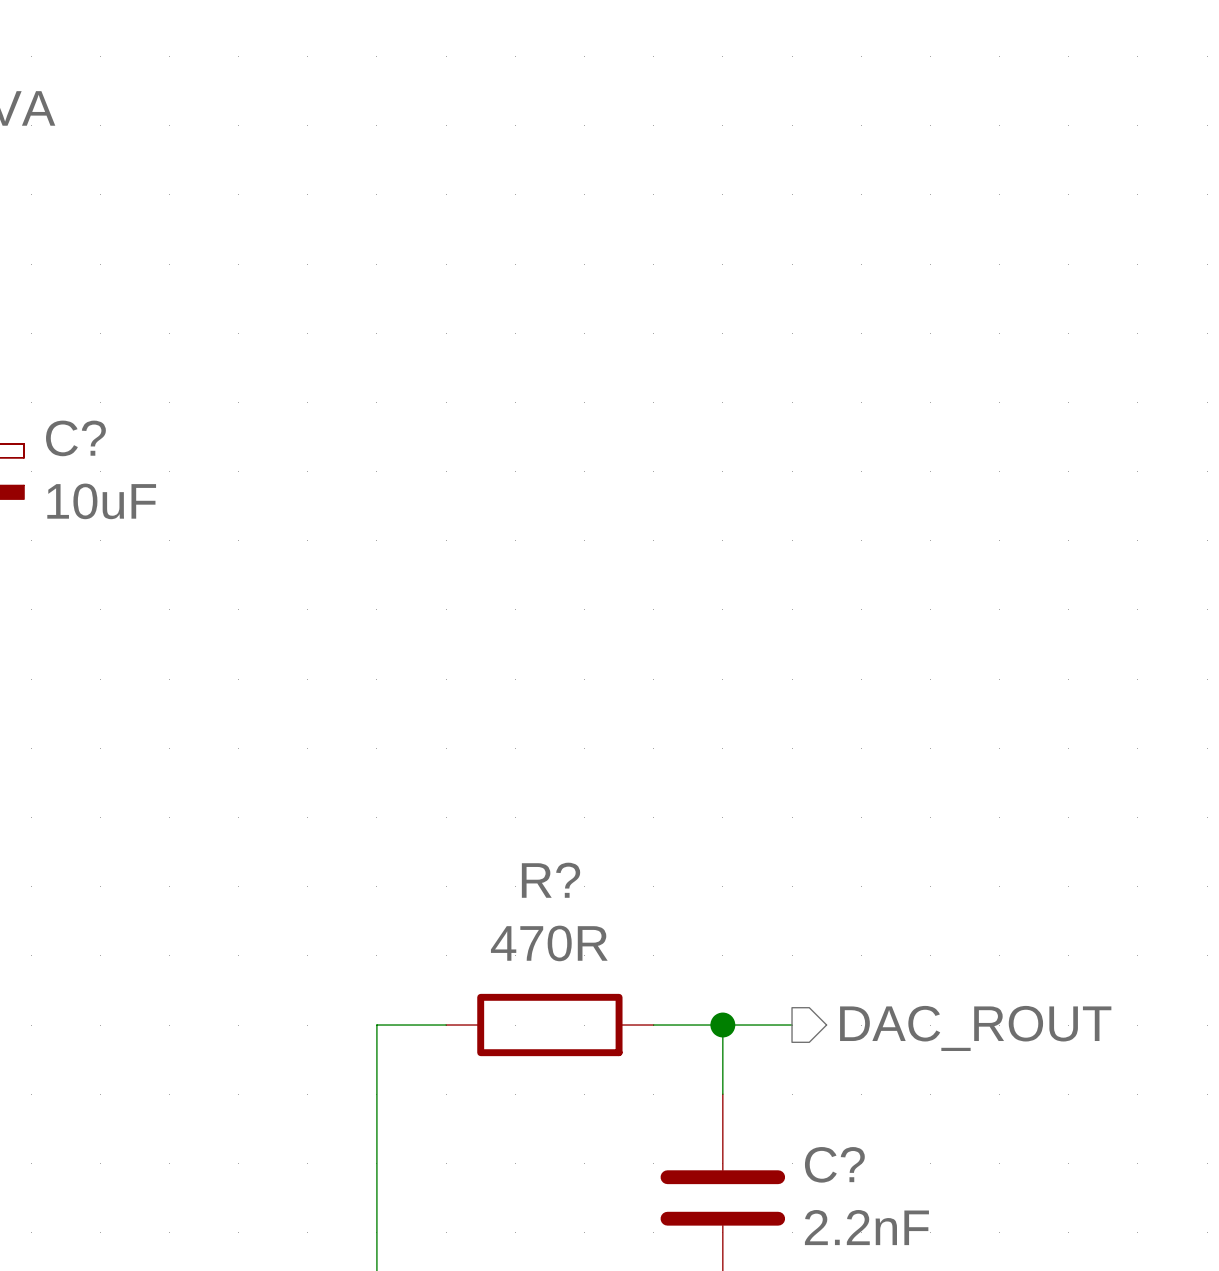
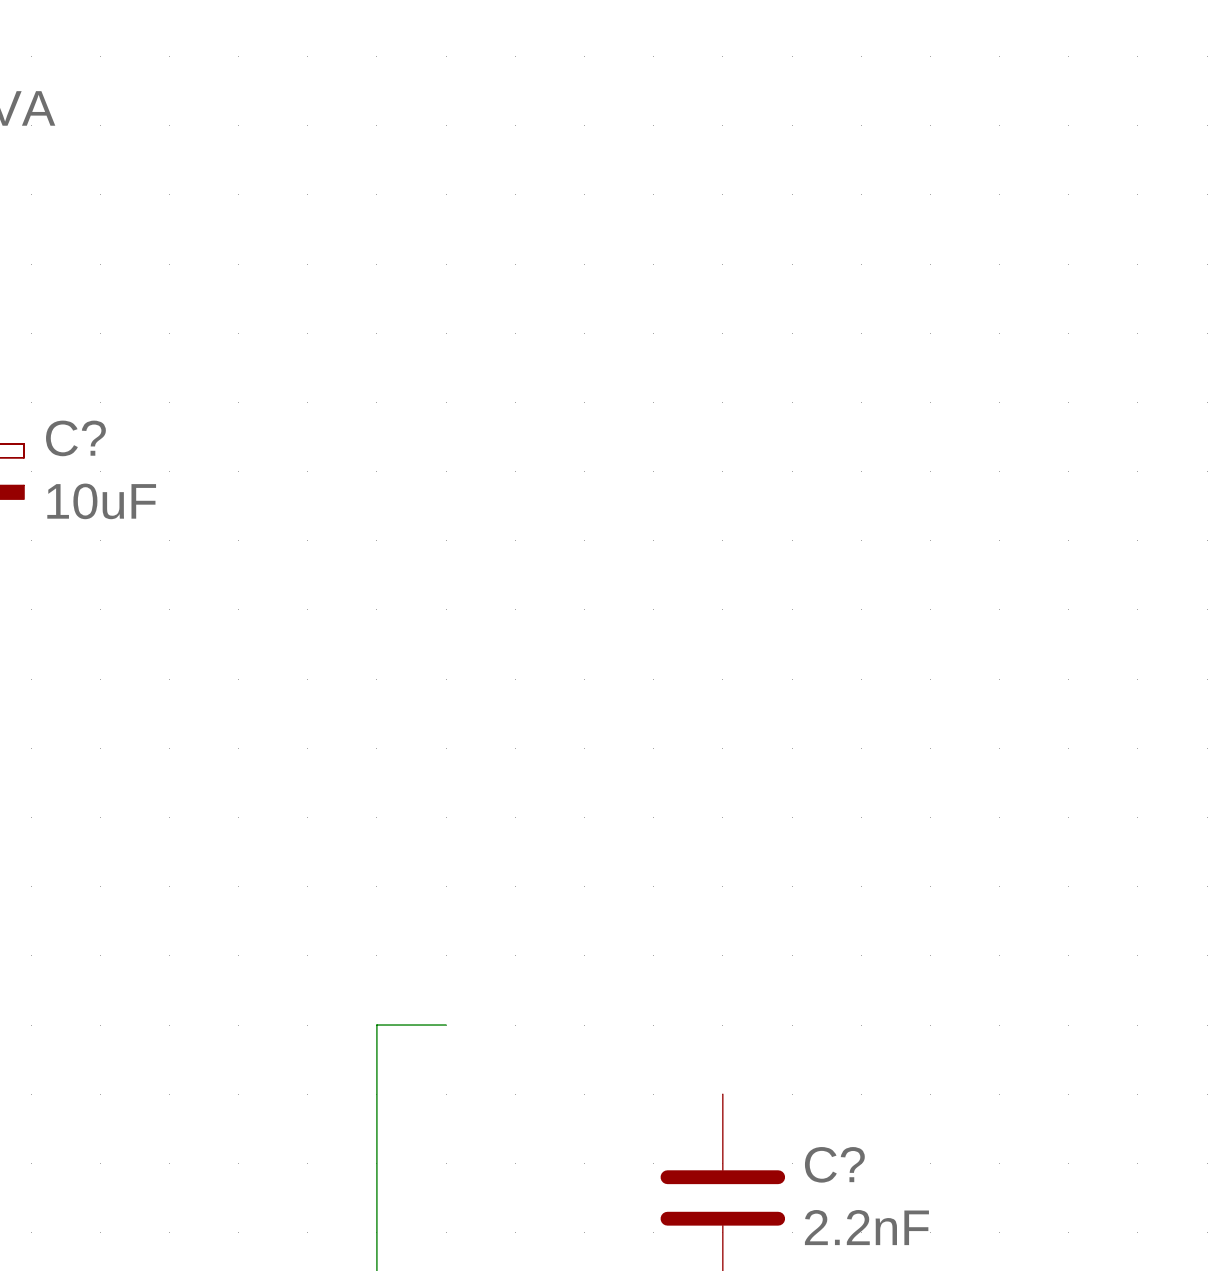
R?: 470R (549, 1025) -> none
wire: (653, 1025) (792, 1025) -> none
wire: (722, 1025) (722, 1094) -> none
junction: (722, 1025) -> none
hierarchical label: DAC_ROUT (975, 1028) -> none

